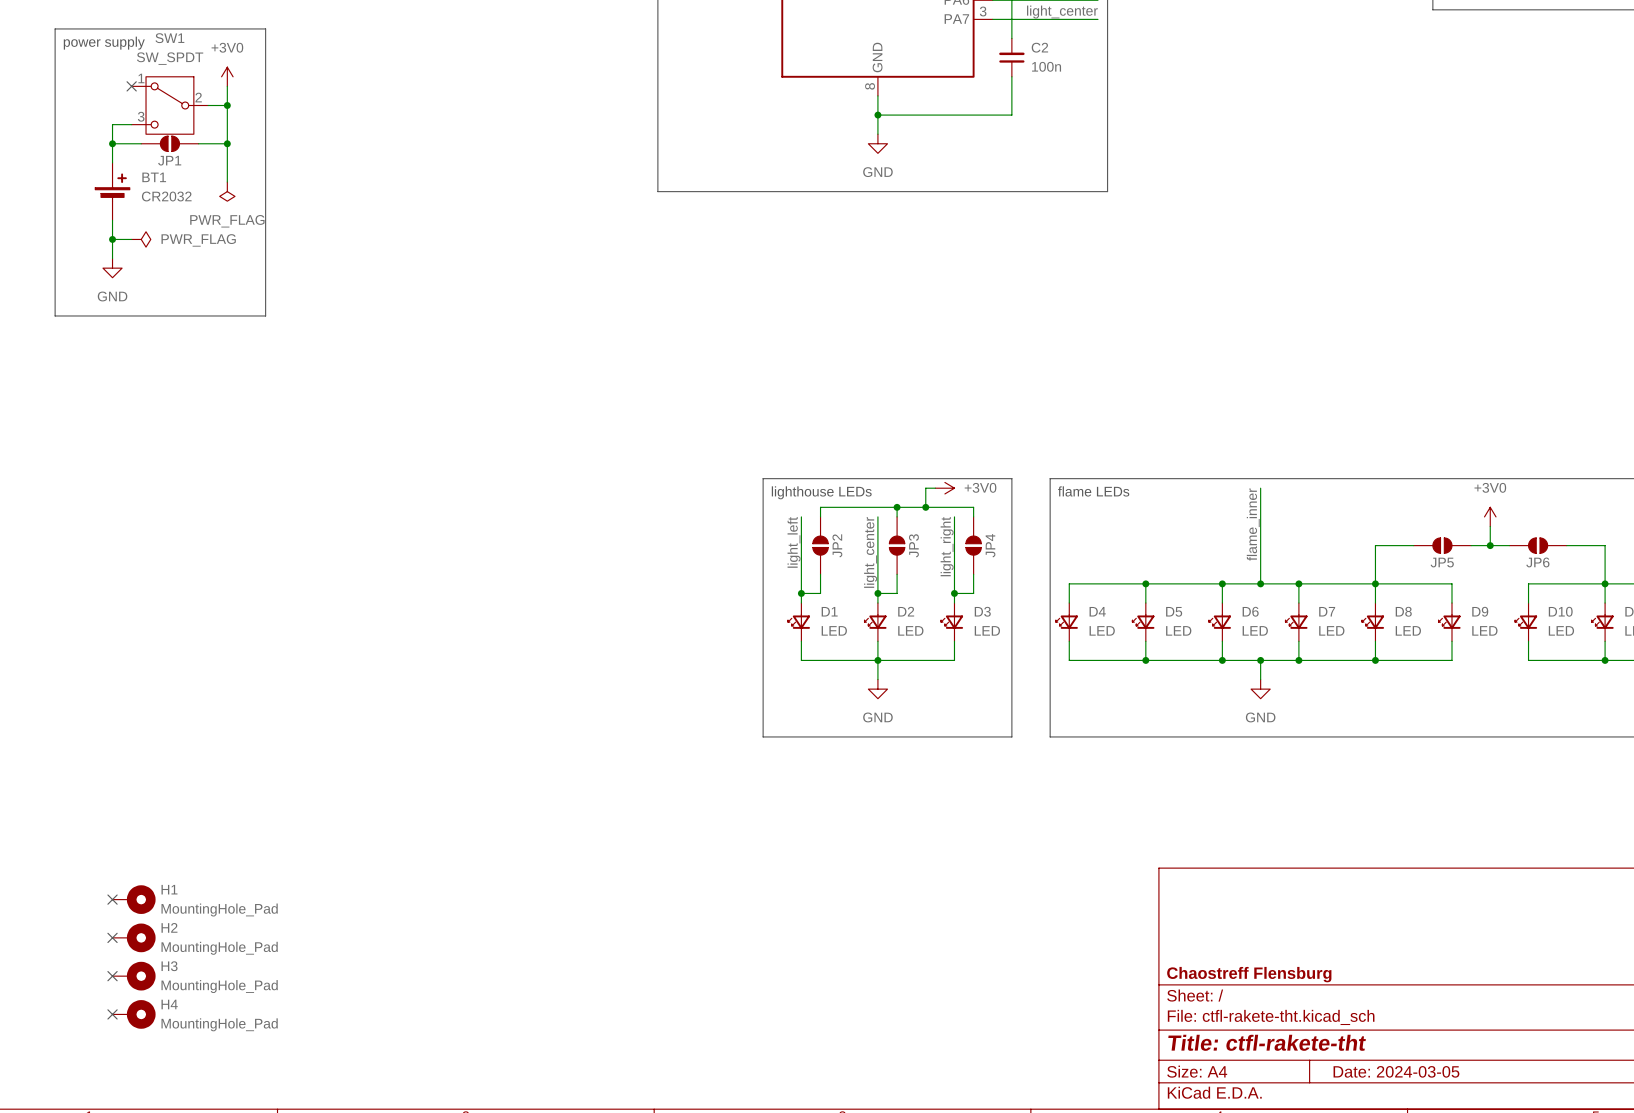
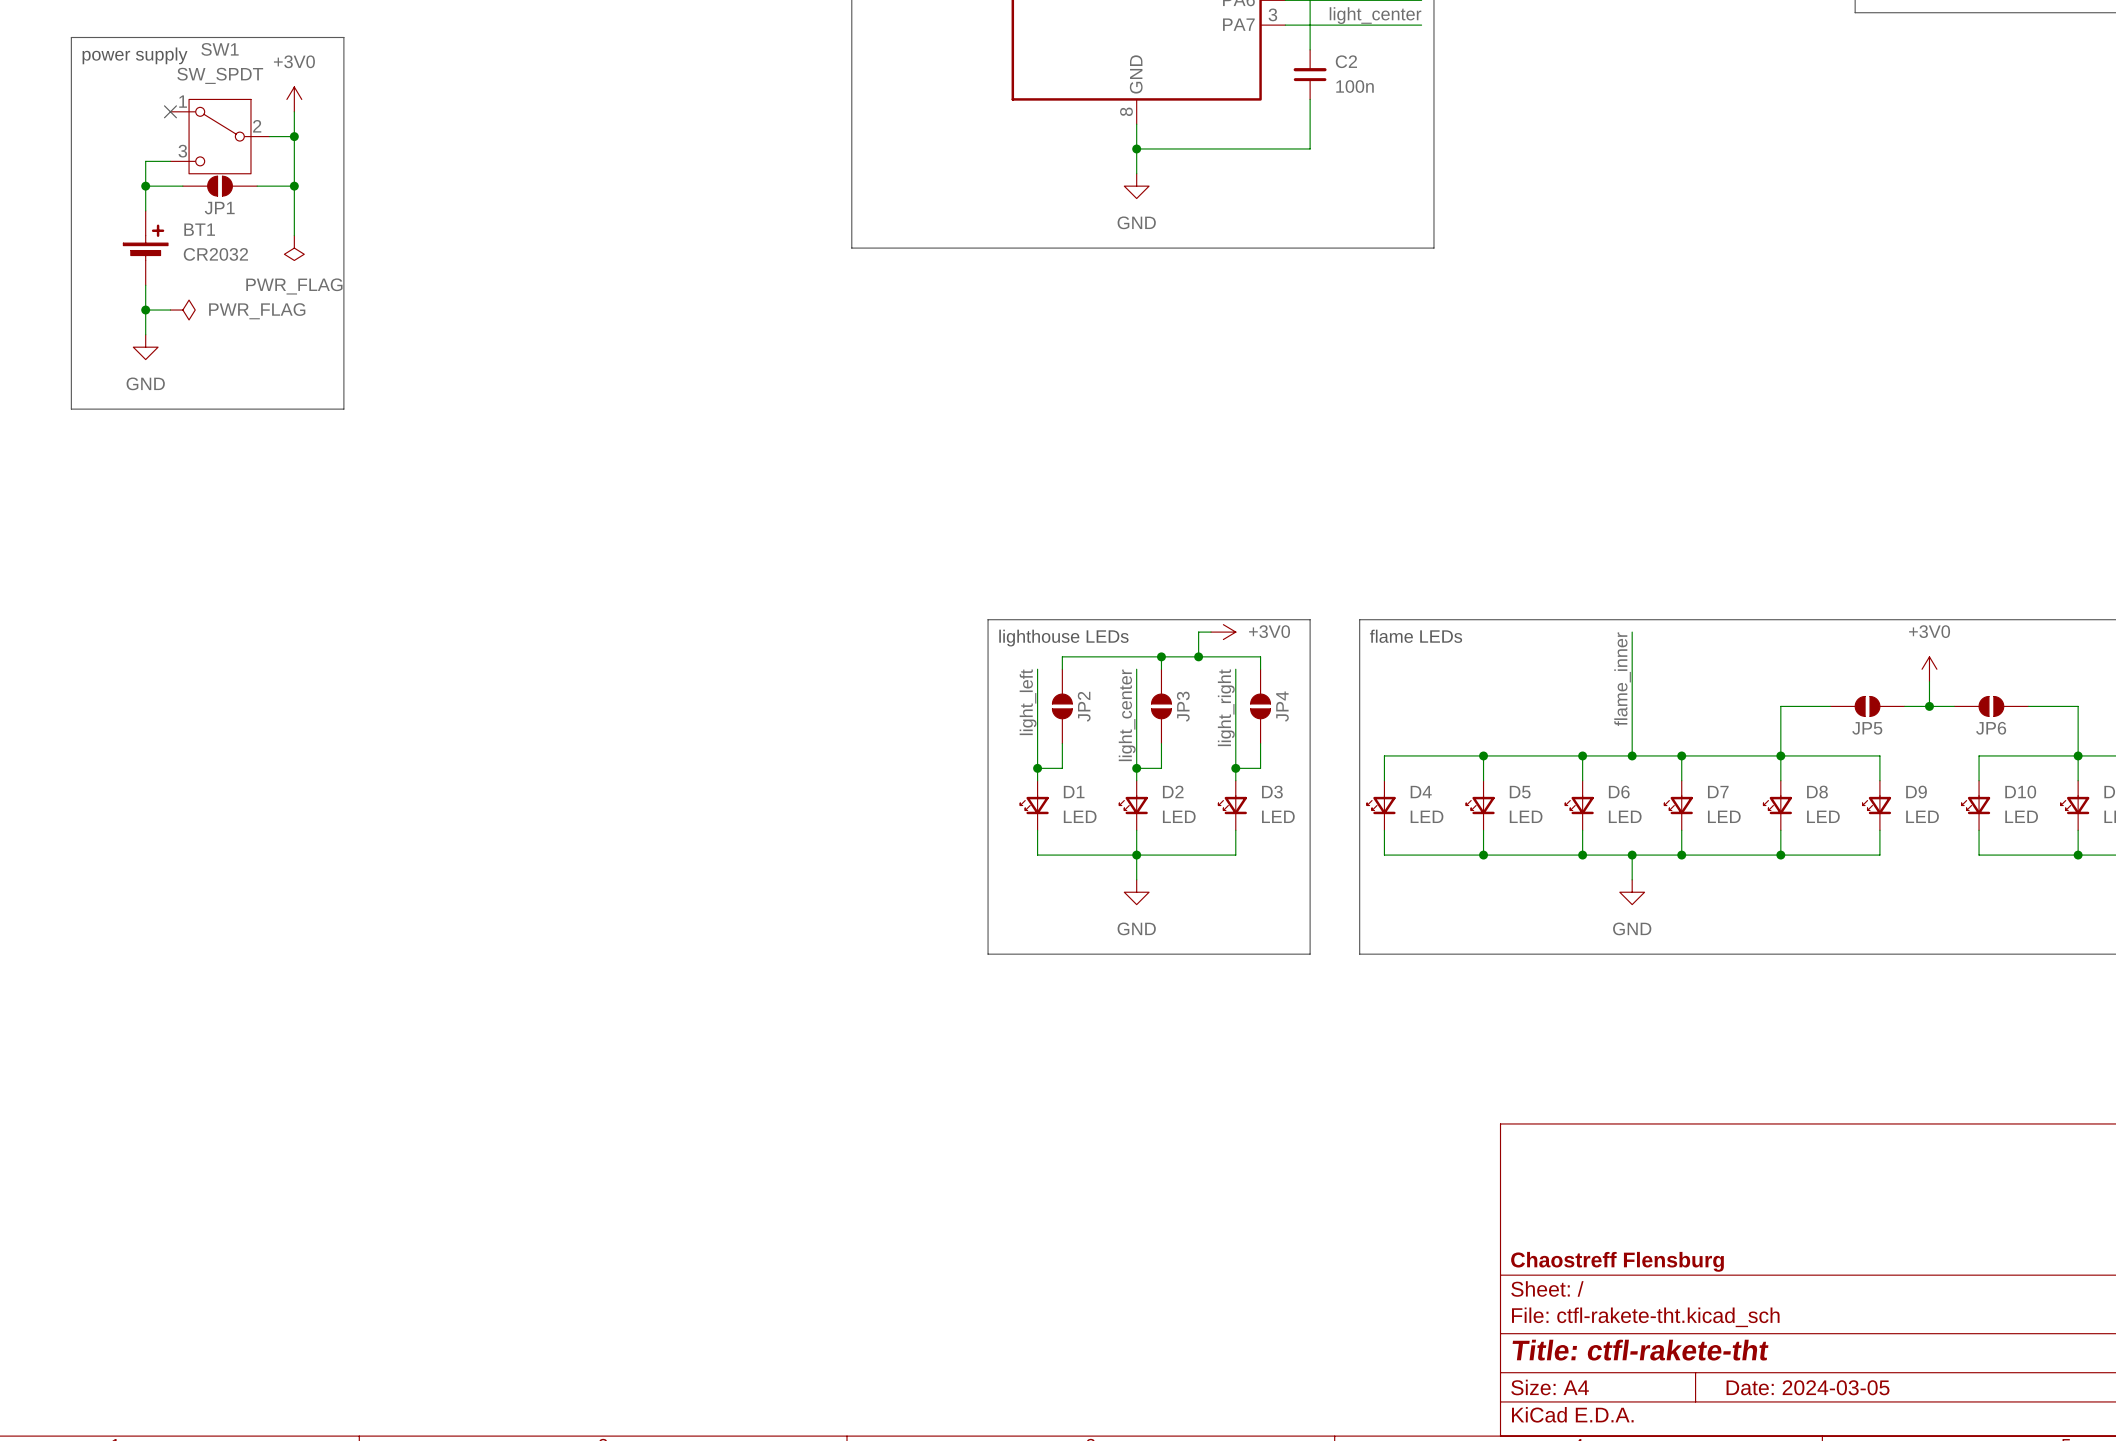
no-connect mark: (112, 899) -> none
H1: MountingHole_Pad (134, 899) -> none
no-connect mark: (112, 937) -> none
H2: MountingHole_Pad (134, 937) -> none
no-connect mark: (112, 976) -> none
H3: MountingHole_Pad (134, 976) -> none
no-connect mark: (112, 1014) -> none
H4: MountingHole_Pad (134, 1014) -> none

